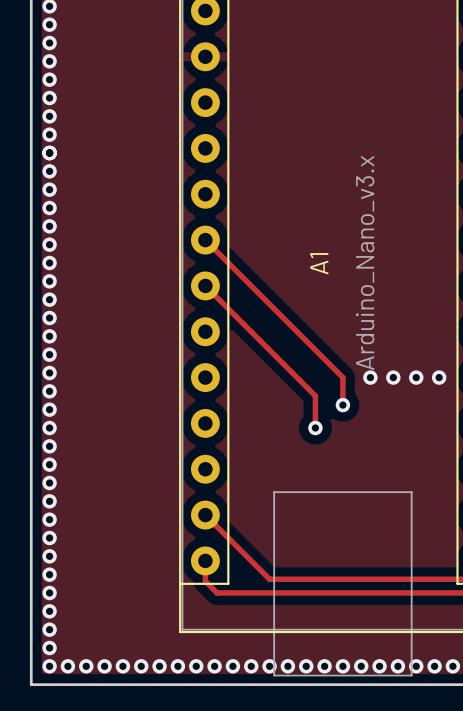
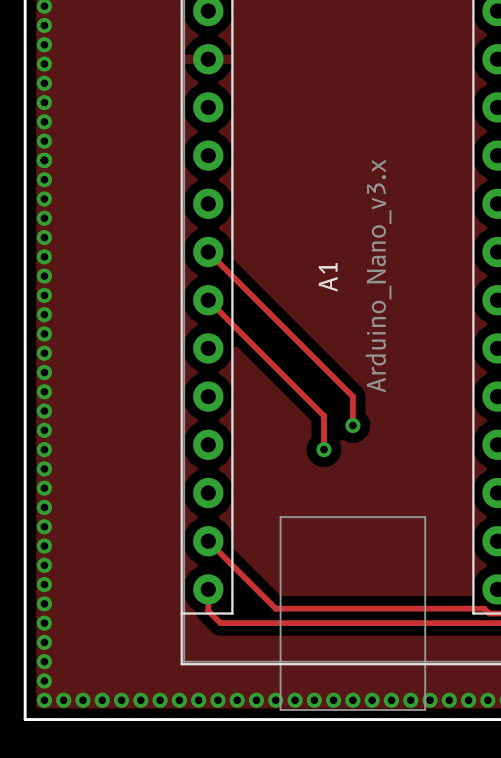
via: (370, 377) -> none
via: (393, 377) -> none
via: (416, 377) -> none
via: (439, 377) -> none

